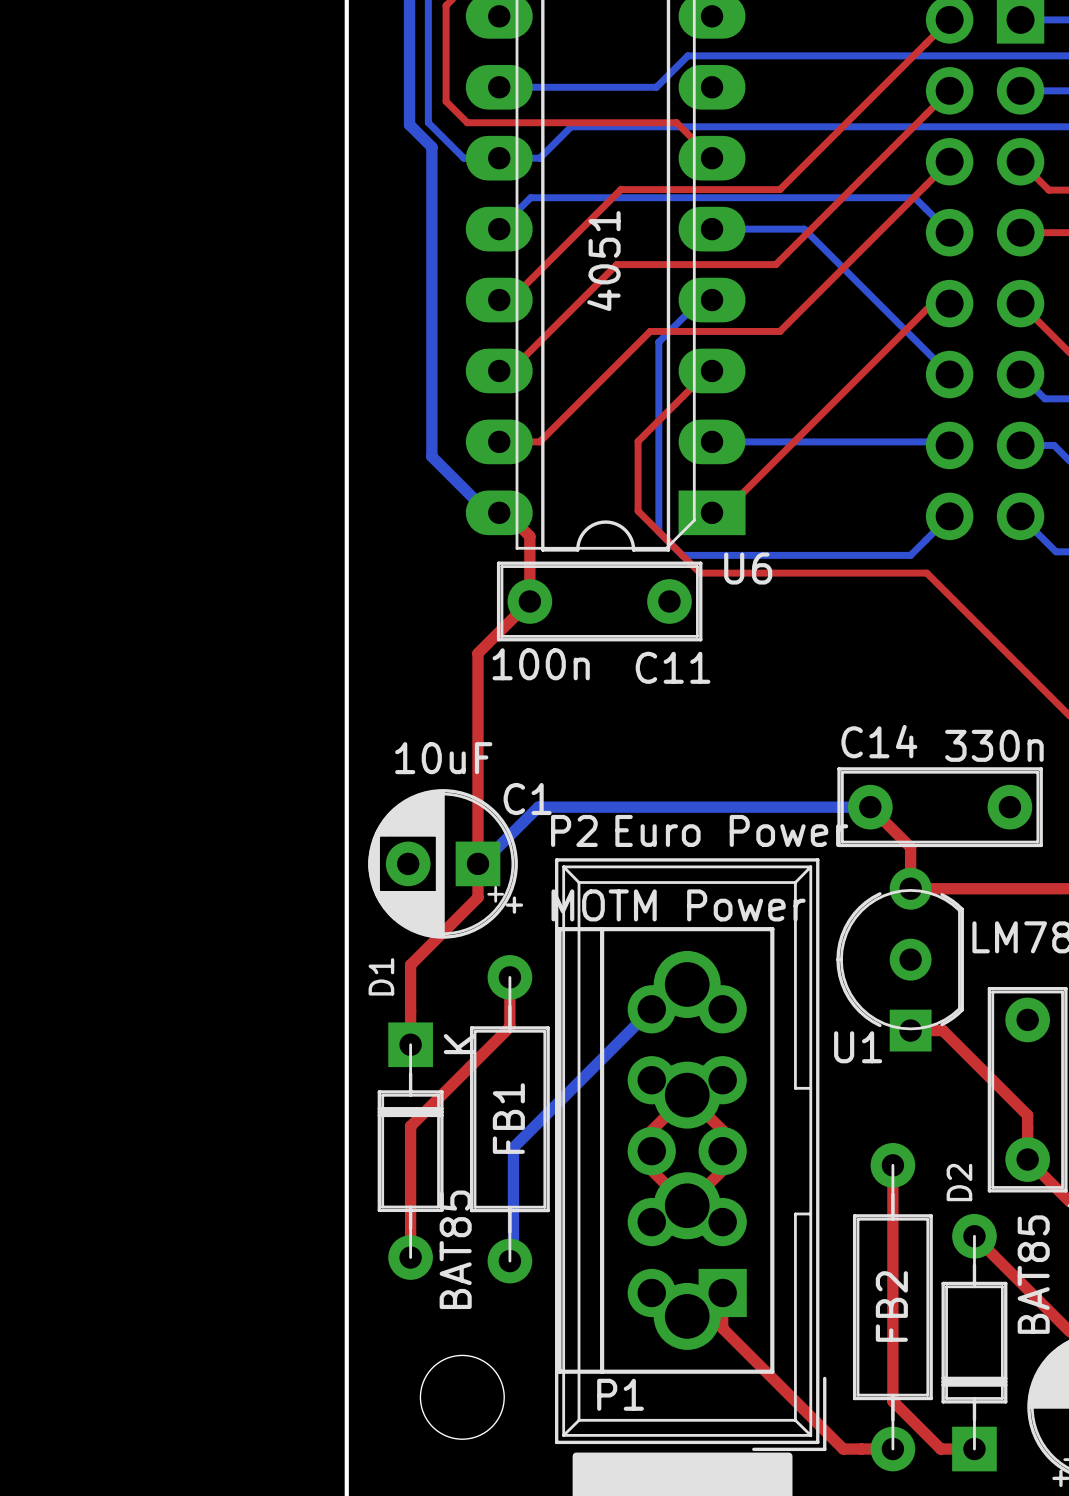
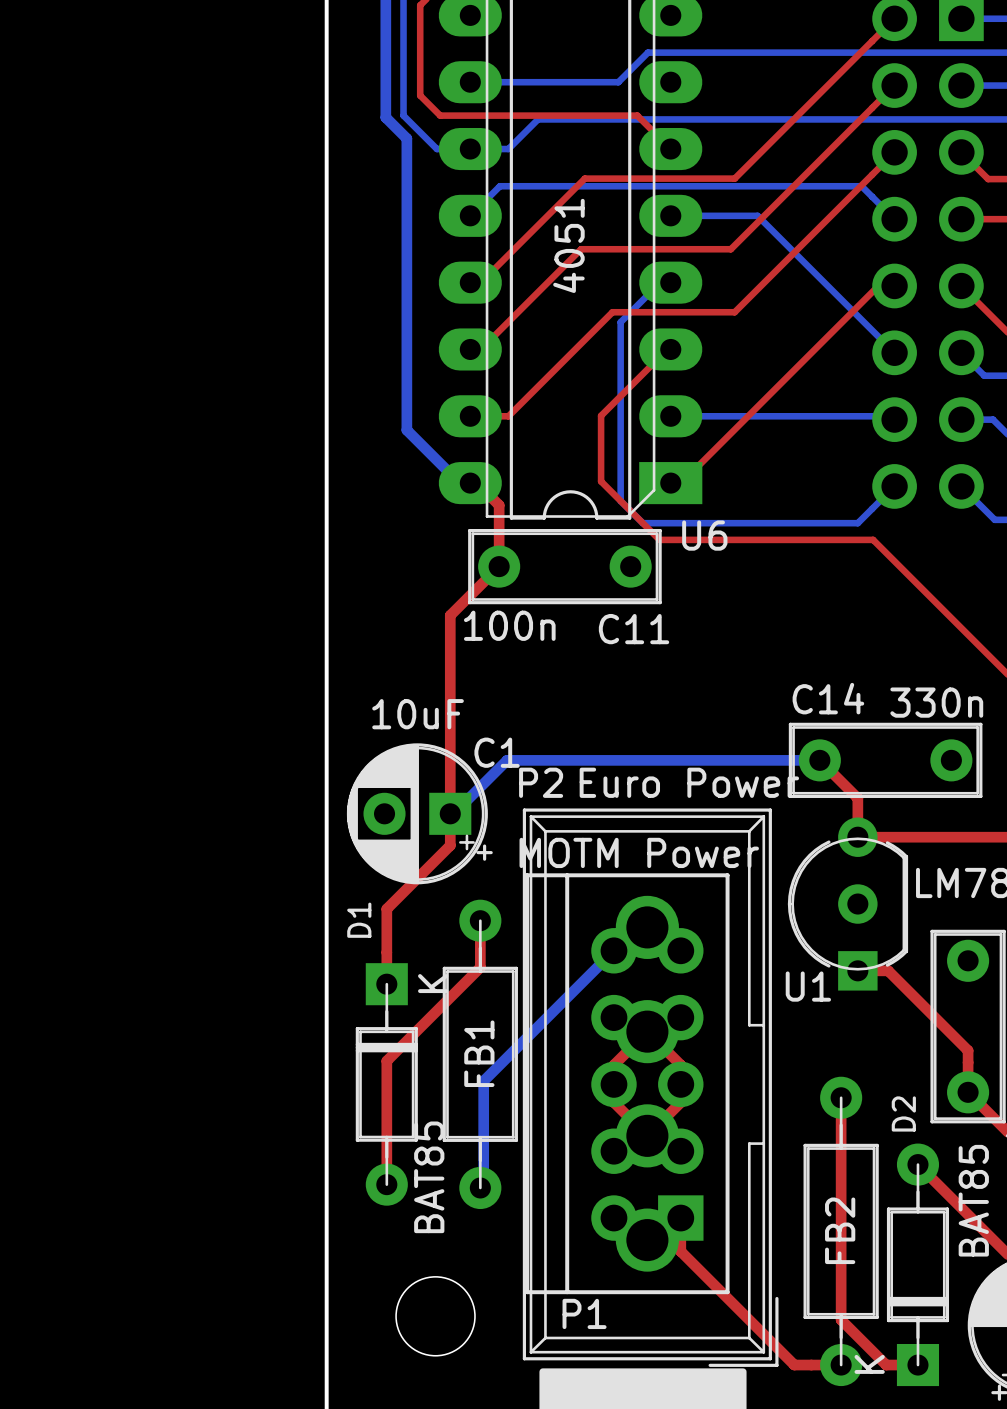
D2 text: none -> K (869, 1364)

